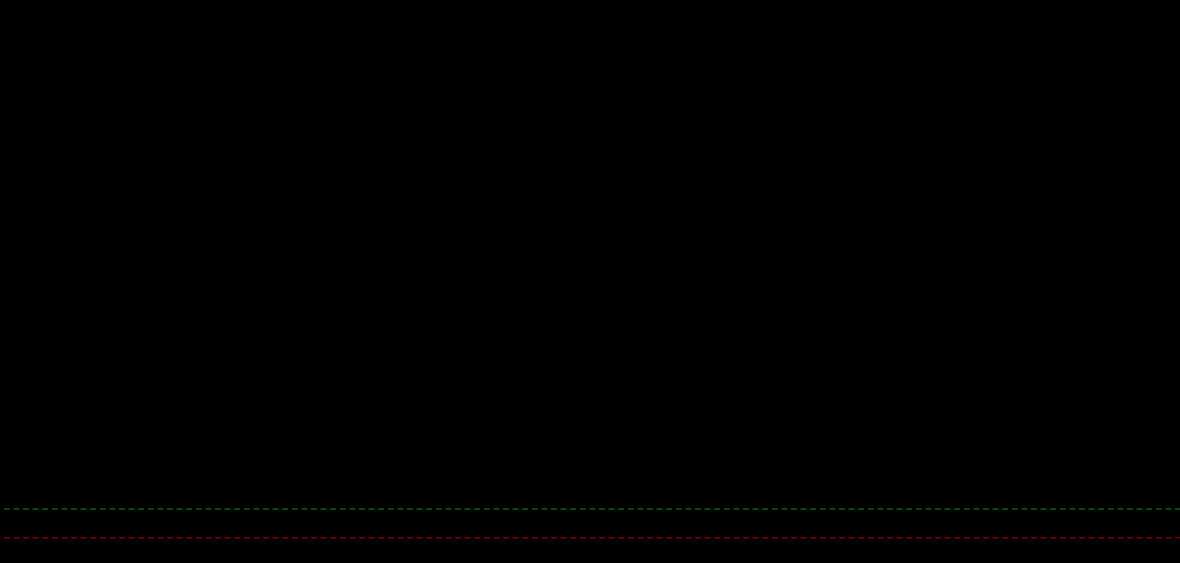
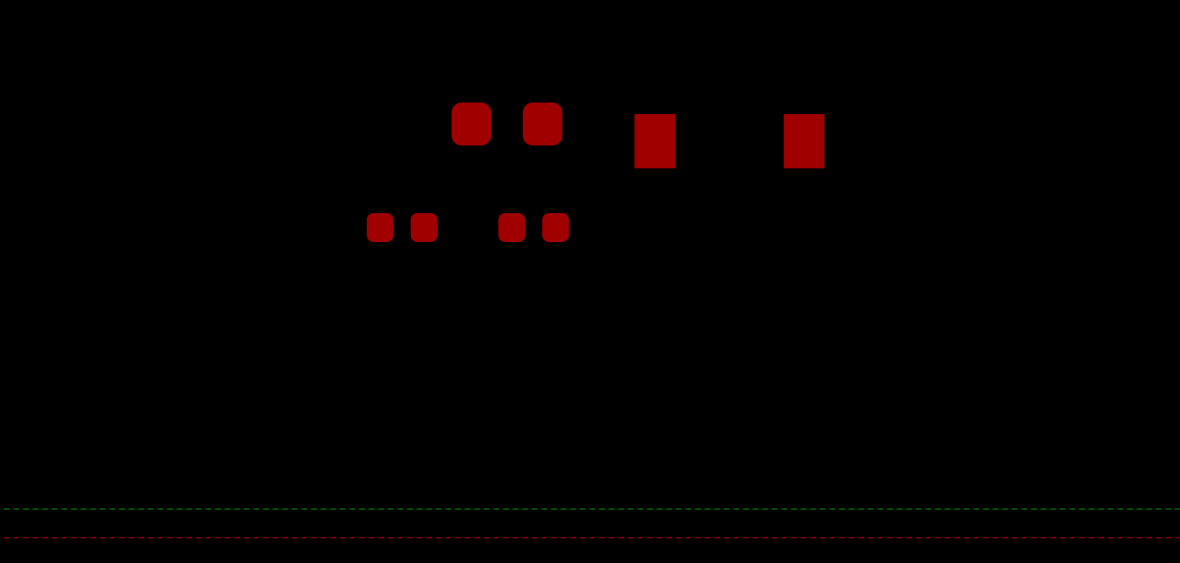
part: none -> (506, 124)
part: none -> (729, 141)
part: none -> (402, 227)
part: none -> (533, 227)

